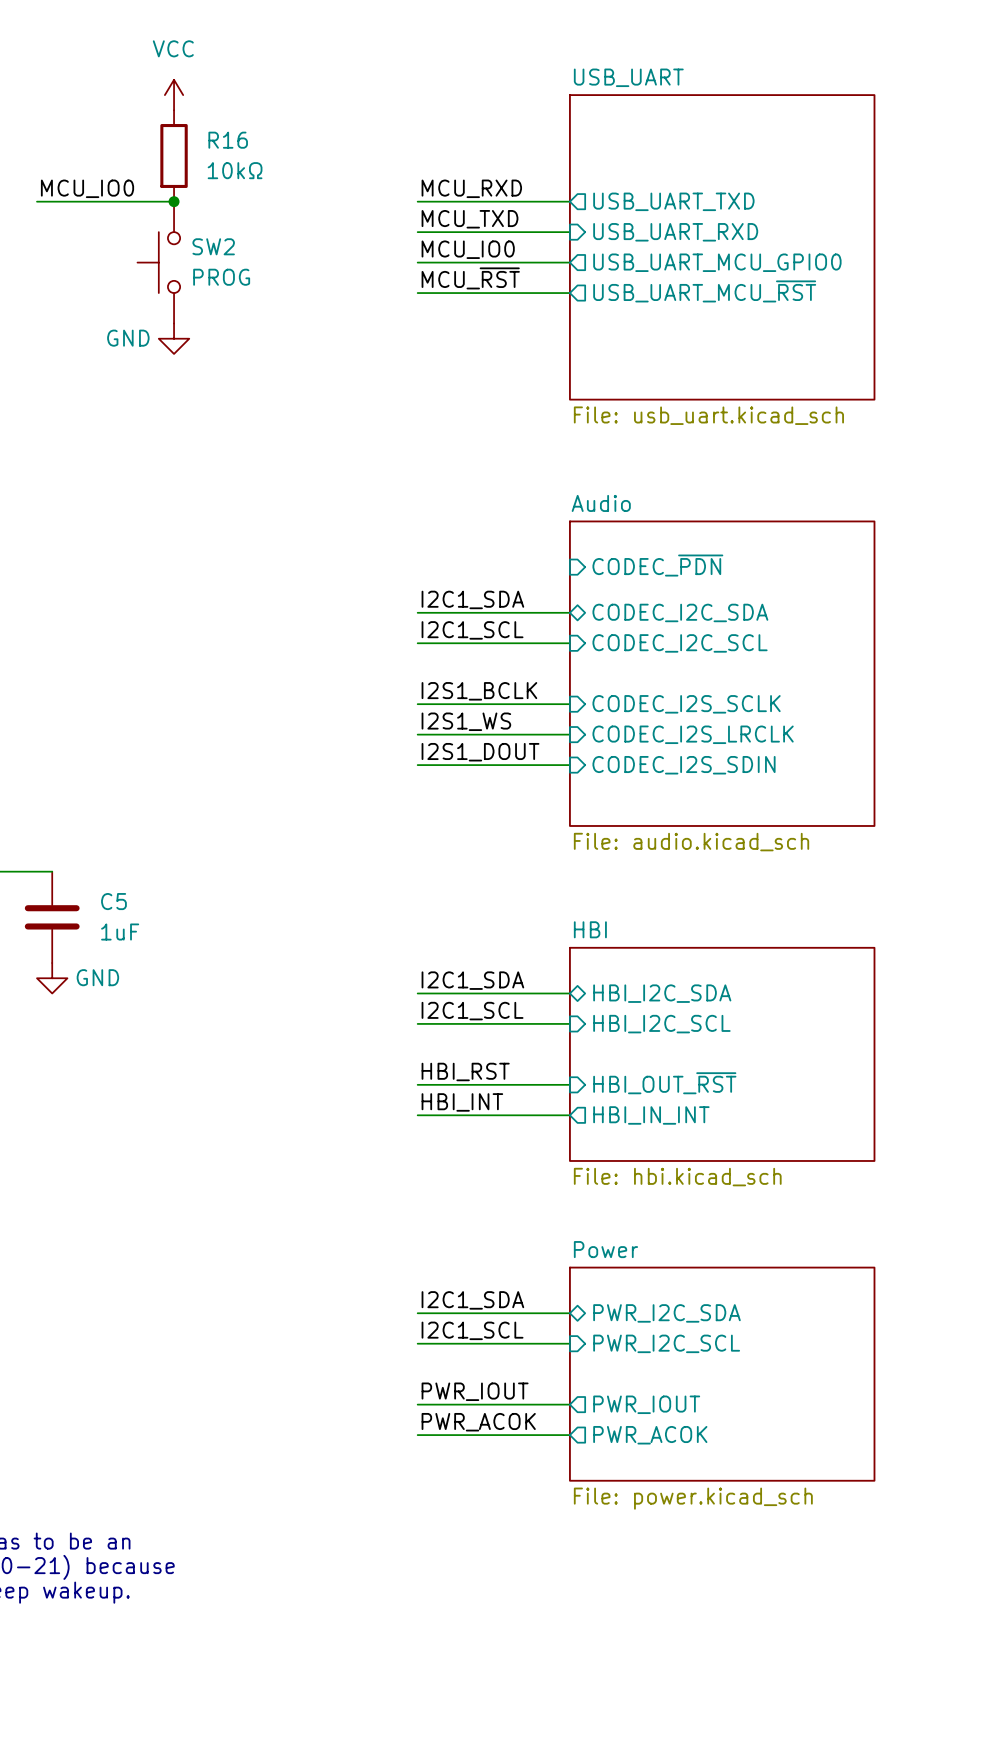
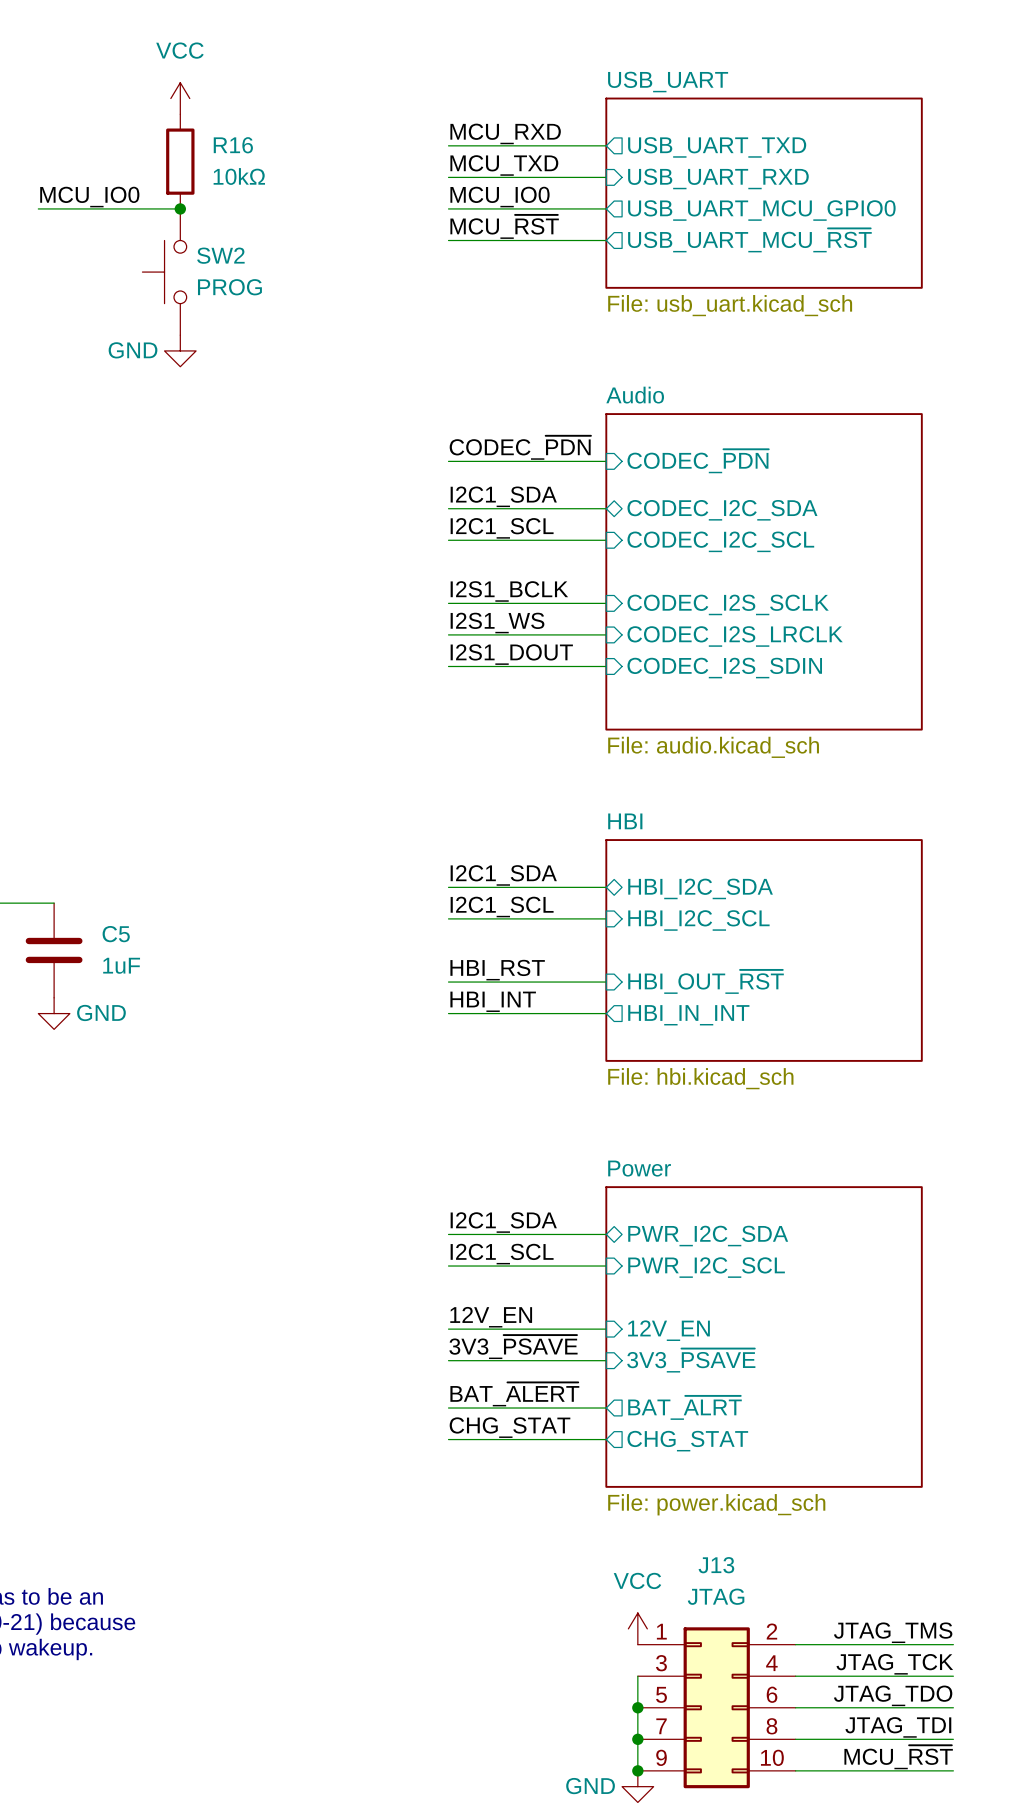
sheet USB_UART: none -> File: usb_uart.kicad_sch (764, 193)
label position: MCU_RXD (471, 188) -> MCU_RXD (505, 133)
wire: (417, 201) (432, 201) -> (590, 208) (606, 208)
sheet pin position: USB_UART_TXD (673, 201) -> USB_UART_TXD (717, 147)
label position: MCU_TXD (469, 219) -> MCU_TXD (504, 165)
wire: (417, 232) (432, 232) -> (590, 240) (606, 240)
sheet pin position: USB_UART_RXD (675, 232) -> USB_UART_RXD (718, 178)
sheet USB_UART: File: usb_uart.kicad_sch (722, 247) -> none
label position: MCU_IO0 (468, 249) -> MCU_IO0 (499, 197)
wire: (417, 262) (569, 262) -> (448, 145) (606, 145)
sheet pin position: USB_UART_MCU_GPIO0 (717, 262) -> USB_UART_MCU_GPIO0 (761, 210)
label position: MCU_~{RST} (470, 278) -> MCU_~{RST} (504, 226)
sheet pin position: USB_UART_MCU_~{RST} (704, 291) -> USB_UART_MCU_~{RST} (749, 240)
wire: (417, 293) (569, 293) -> (448, 177) (606, 177)
label: none -> CODEC_~{PDN} (520, 447)
wire: none -> (448, 461) (606, 461)
label: none -> I2C1_SDA (503, 496)
wire: none -> (448, 508) (606, 508)
label: none -> I2C1_SCL (502, 528)
sheet pin position: CODEC_~{PDN} (657, 565) -> CODEC_~{PDN} (698, 461)
label: I2C1_SDA (472, 599) -> none
wire: (417, 612) (432, 612) -> (590, 634) (606, 634)
sheet pin position: CODEC_I2C_SDA (680, 612) -> CODEC_I2C_SDA (722, 510)
label: I2C1_SCL (472, 630) -> none
wire: (417, 643) (432, 643) -> (590, 666) (606, 666)
sheet pin position: CODEC_I2C_SCL (680, 643) -> CODEC_I2C_SCL (720, 541)
sheet Audio position: (722, 673) -> (764, 571)
label position: I2S1_BCLK (479, 691) -> I2S1_BCLK (509, 591)
wire: (417, 704) (569, 704) -> (448, 603) (606, 603)
sheet pin position: CODEC_I2S_SCLK (686, 704) -> CODEC_I2S_SCLK (728, 604)
label position: I2S1_WS (466, 721) -> I2S1_WS (497, 623)
wire: (417, 734) (569, 734) -> (448, 540) (606, 540)
sheet pin position: CODEC_I2S_LRCLK (693, 734) -> CODEC_I2S_LRCLK (735, 636)
label position: I2S1_DOUT (480, 752) -> I2S1_DOUT (511, 654)
wire: (417, 765) (569, 765) -> (448, 918) (606, 918)
sheet pin position: CODEC_I2S_SDIN (684, 765) -> CODEC_I2S_SDIN (724, 668)
label: none -> I2C1_SDA (503, 875)
wire: none -> (448, 887) (606, 887)
label: none -> I2C1_SCL (502, 907)
label: I2C1_SDA (472, 980) -> none
wire: (417, 993) (569, 993) -> (448, 982) (606, 982)
sheet pin position: HBI_I2C_SDA (662, 993) -> HBI_I2C_SDA (700, 888)
label: I2C1_SCL (472, 1011) -> none
wire: (417, 1023) (569, 1023) -> (448, 1013) (606, 1013)
sheet pin position: HBI_I2C_SCL (661, 1024) -> HBI_I2C_SCL (698, 920)
sheet HBI position: (722, 1054) -> (764, 950)
label position: HBI_RST (465, 1071) -> HBI_RST (497, 970)
sheet pin position: HBI_OUT_~{RST} (664, 1083) -> HBI_OUT_~{RST} (706, 981)
wire: (417, 1084) (569, 1084) -> (448, 1234) (606, 1234)
label position: HBI_INT (462, 1102) -> HBI_INT (493, 1001)
wire: (417, 1115) (569, 1115) -> (448, 1408) (606, 1408)
sheet pin position: HBI_IN_INT (651, 1115) -> HBI_IN_INT (688, 1015)
label: none -> I2C1_SDA (503, 1222)
label: none -> I2C1_SCL (502, 1254)
label: none -> 12V_EN (491, 1317)
sheet pin: none -> 12V_EN (668, 1330)
sheet Power: none -> File: power.kicad_sch (764, 1337)
label: none -> 3V3_~{PSAVE} (513, 1347)
label: I2C1_SDA (472, 1300) -> none
sheet pin: none -> 3V3_~{PSAVE} (691, 1360)
wire: (417, 1313) (432, 1313) -> (590, 1360) (606, 1360)
sheet pin position: PWR_I2C_SDA (666, 1313) -> PWR_I2C_SDA (708, 1236)
label: I2C1_SCL (472, 1330) -> none
wire: (417, 1343) (569, 1343) -> (448, 1266) (606, 1266)
sheet pin position: PWR_I2C_SCL (666, 1343) -> PWR_I2C_SCL (706, 1267)
label: none -> BAT_~{ALERT} (514, 1394)
sheet pin: none -> BAT_~{ALRT} (685, 1407)
sheet Power: File: power.kicad_sch (722, 1374) -> none
label: none -> CHG_STAT (510, 1427)
sheet pin: none -> CHG_STAT (687, 1441)
label: PWR_IOUT (475, 1391) -> none
wire: (417, 1404) (569, 1404) -> (448, 1329) (606, 1329)
sheet pin: PWR_IOUT (646, 1404) -> none
label: PWR_ACOK (478, 1422) -> none
wire: (417, 1435) (569, 1435) -> (448, 1439) (606, 1439)
sheet pin: PWR_ACOK (650, 1435) -> none
power symbol: none -> VCC (637, 1628)
label: none -> JTAG_TMS (893, 1632)
wire: none -> (795, 1644) (953, 1644)
label: none -> JTAG_TCK (894, 1664)
wire: none -> (637, 1676) (637, 1770)
wire: none -> (795, 1676) (953, 1676)
label: none -> JTAG_TDO (893, 1695)
junction: none -> (637, 1707)
J13: none -> JTAG (716, 1707)
wire: none -> (795, 1707) (953, 1707)
label: none -> JTAG_TDI (898, 1727)
junction: none -> (637, 1739)
wire: none -> (795, 1739) (953, 1739)
label: none -> MCU_~{RST} (898, 1757)
junction: none -> (637, 1770)
wire: none -> (795, 1770) (953, 1770)
power symbol: none -> GND (637, 1786)

